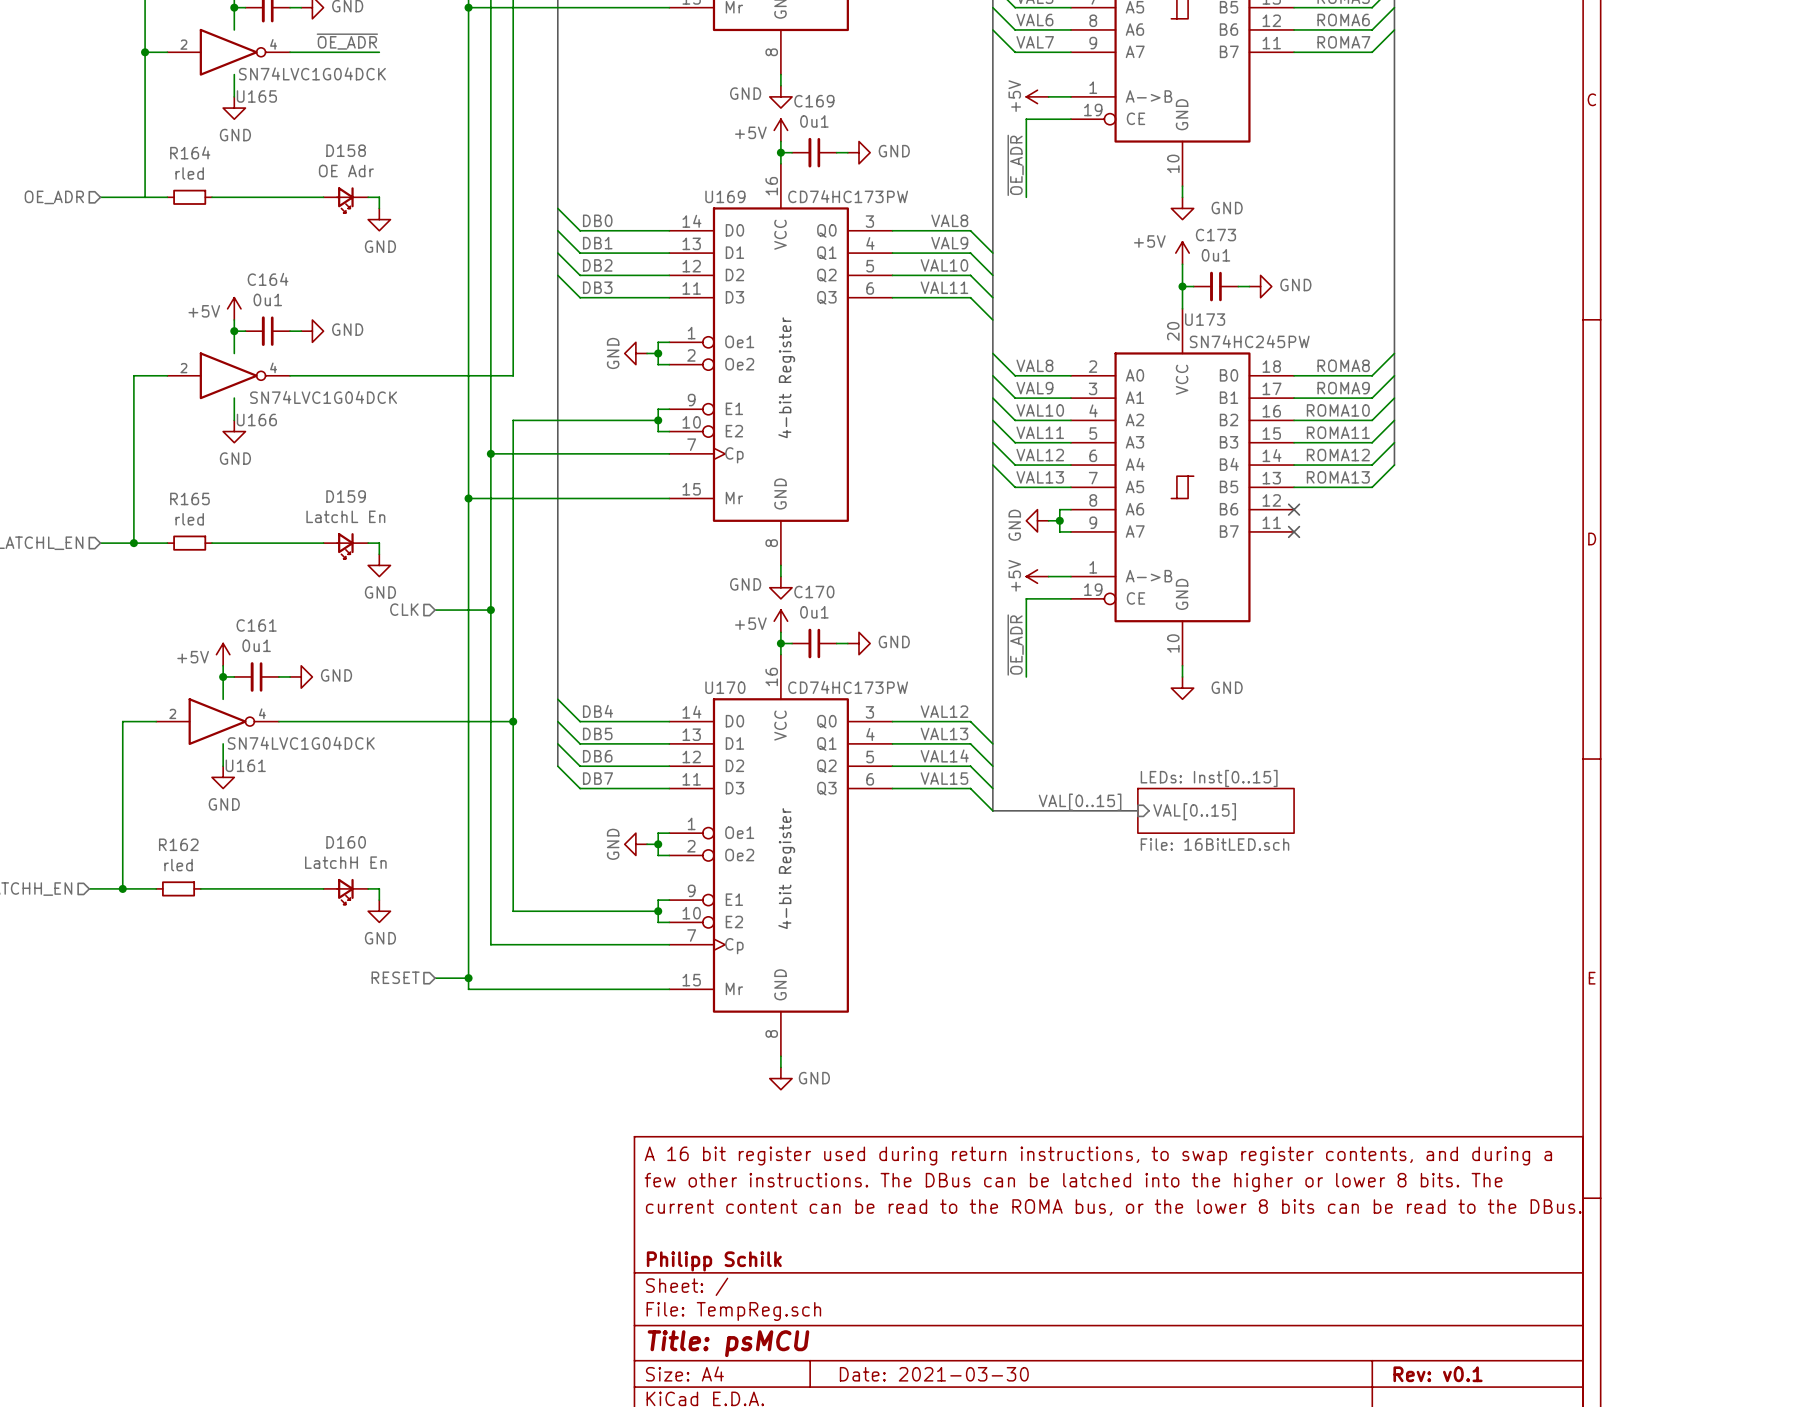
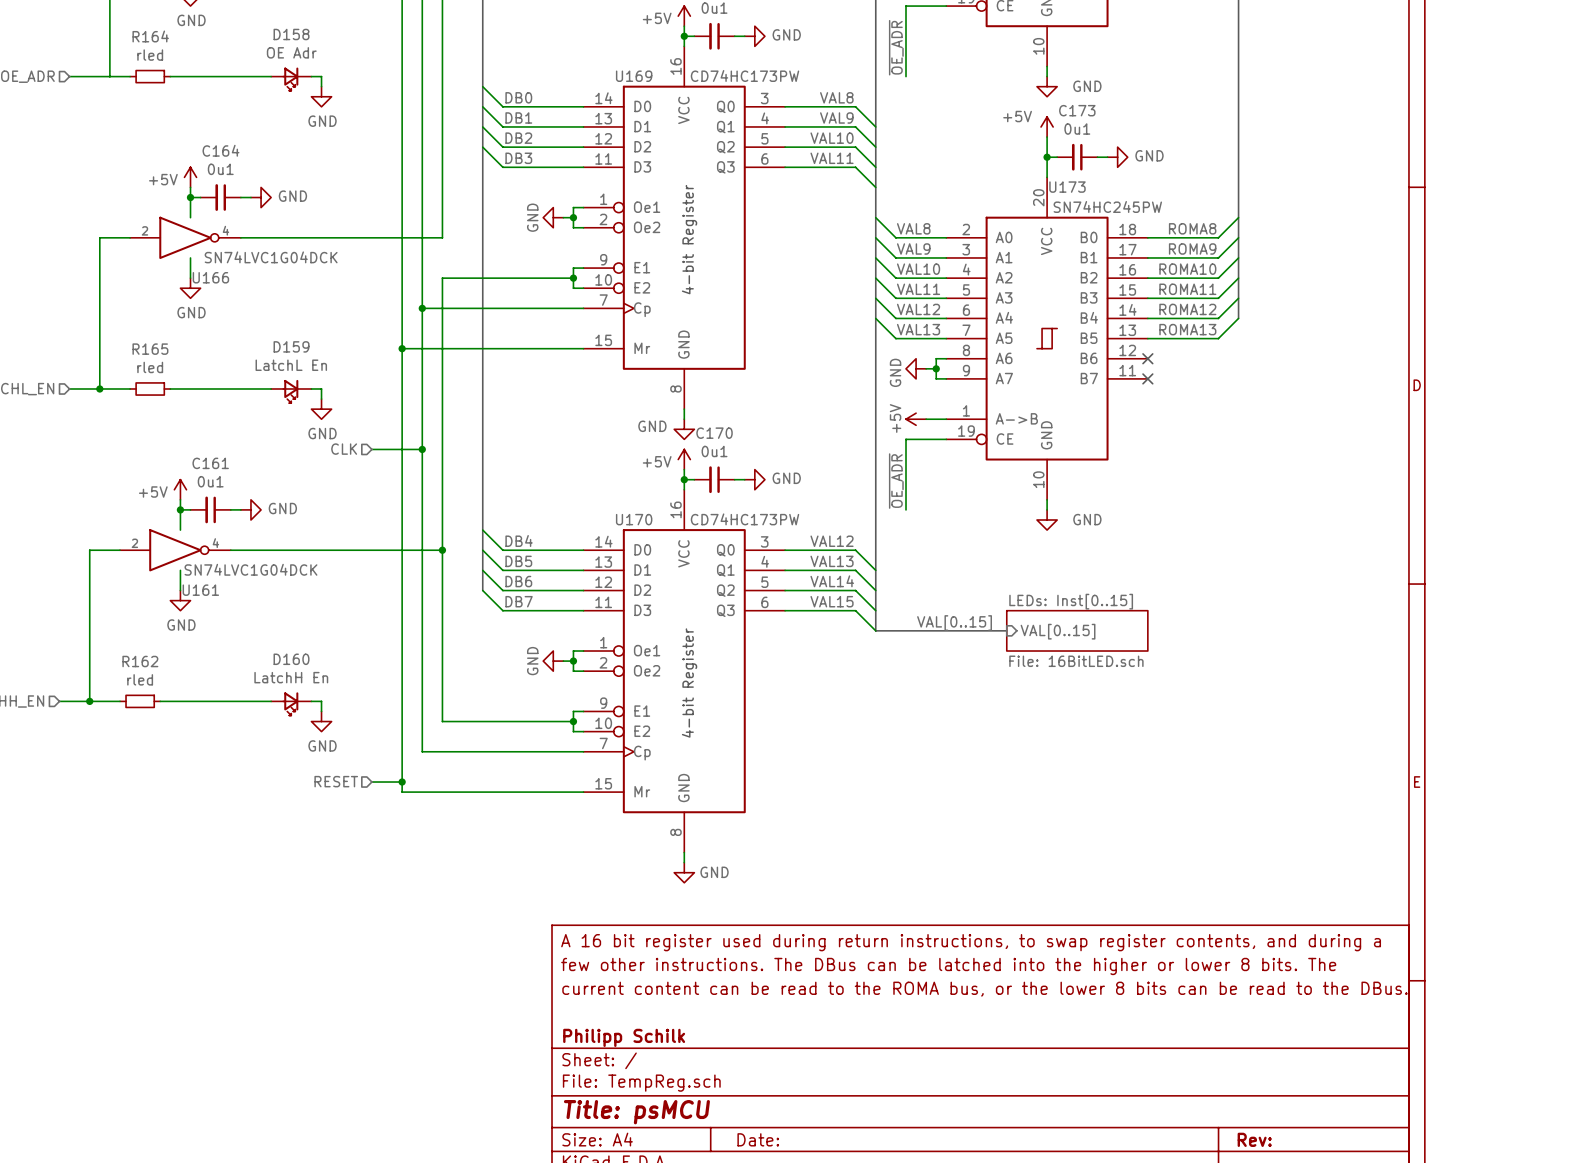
title block: Date: 2021-03-30 (934, 1374) -> Date: (758, 1139)
title block: Rev: v0.1 (1438, 1374) -> Rev: (1254, 1139)

